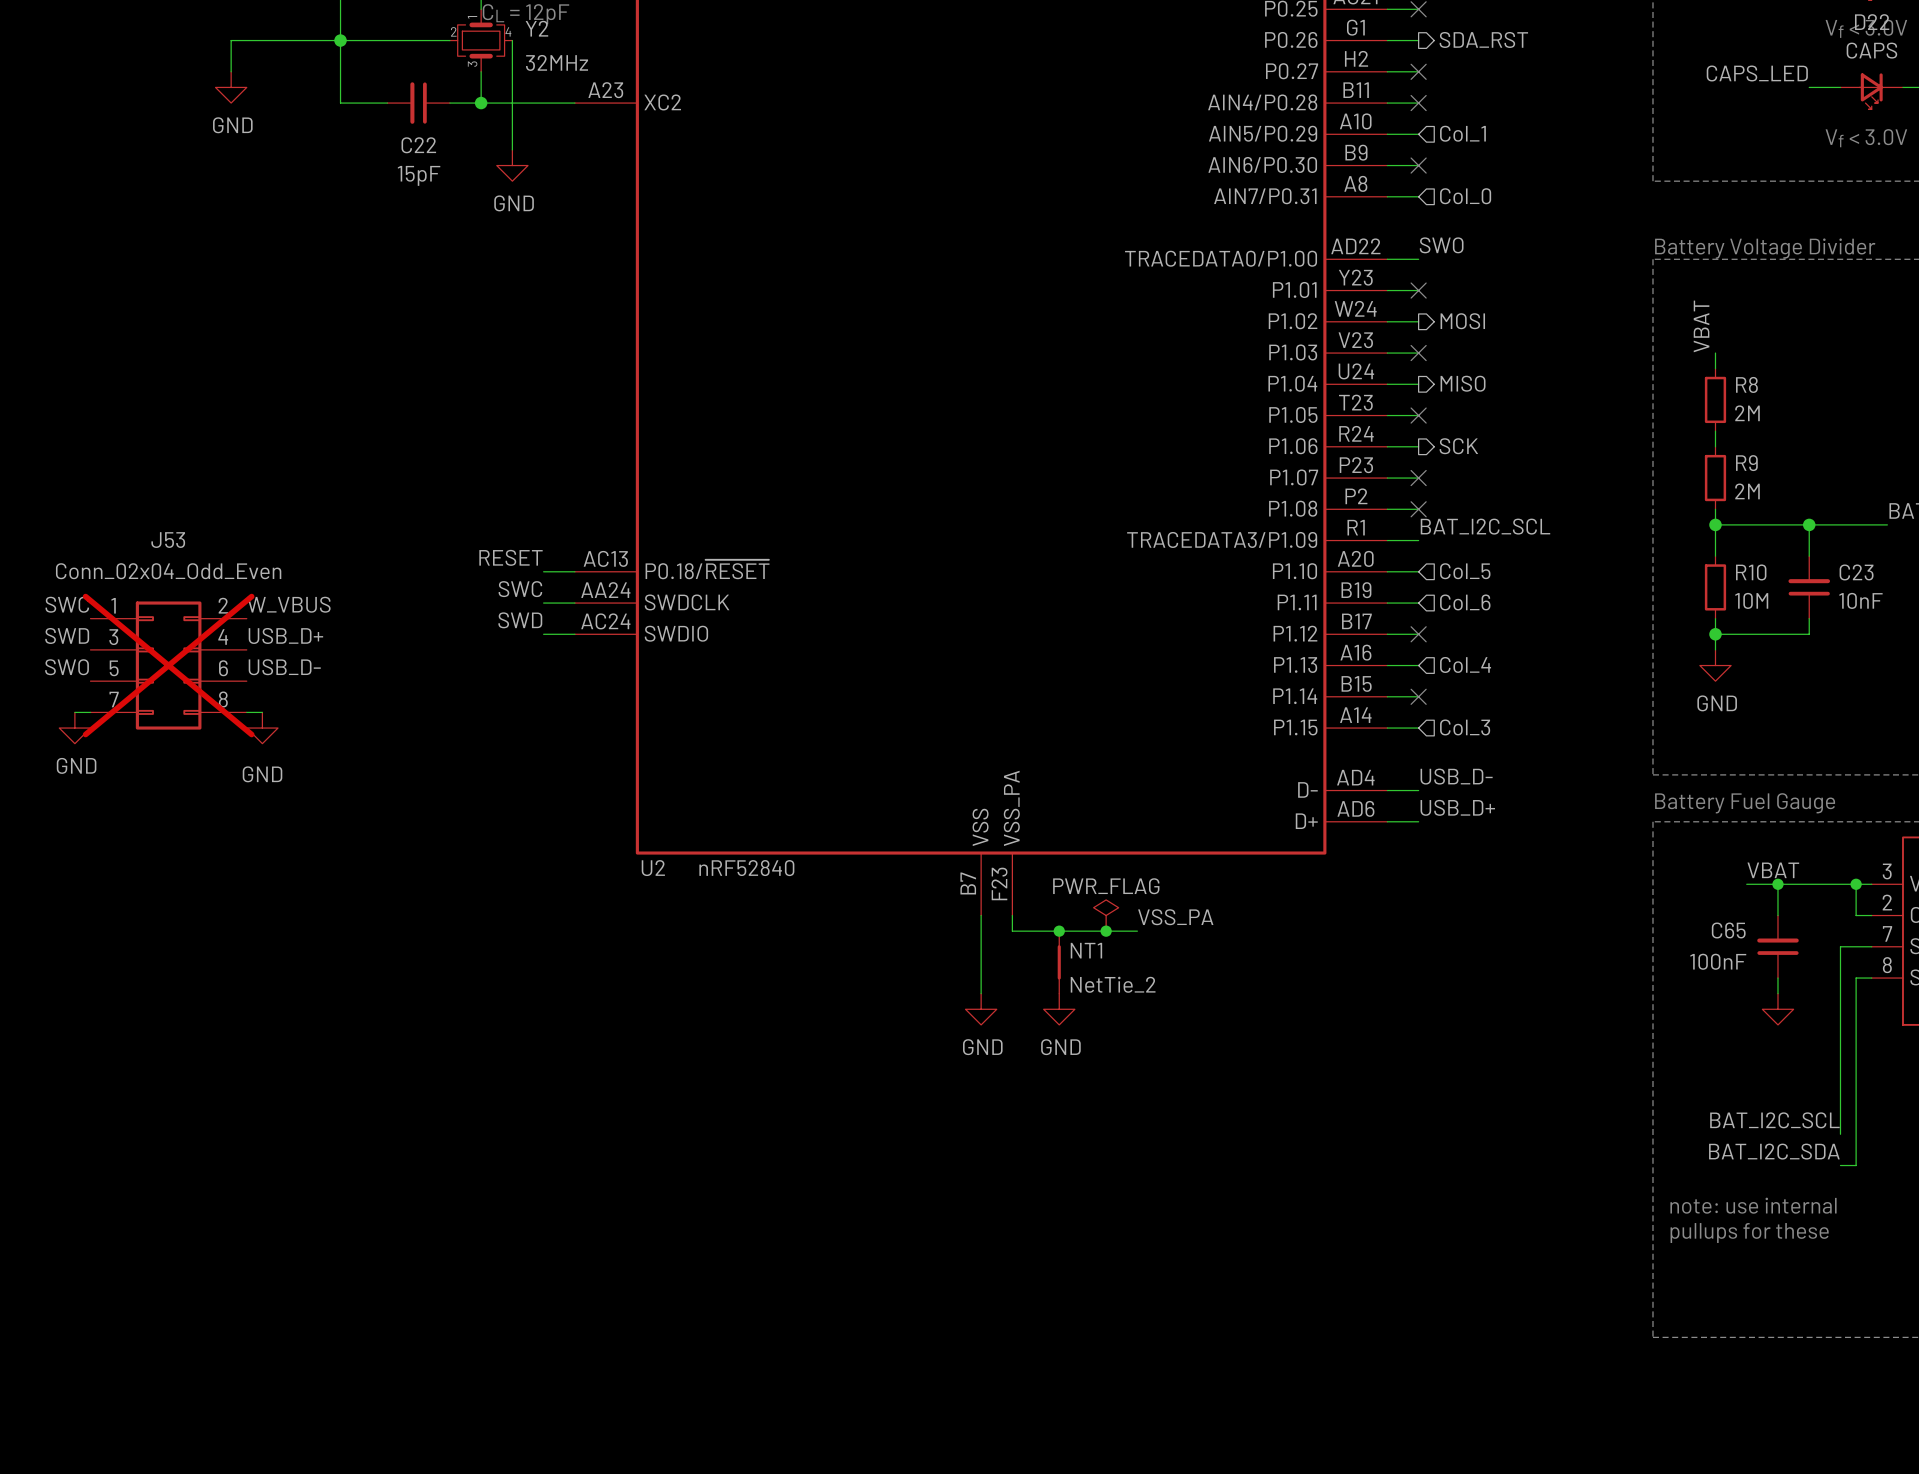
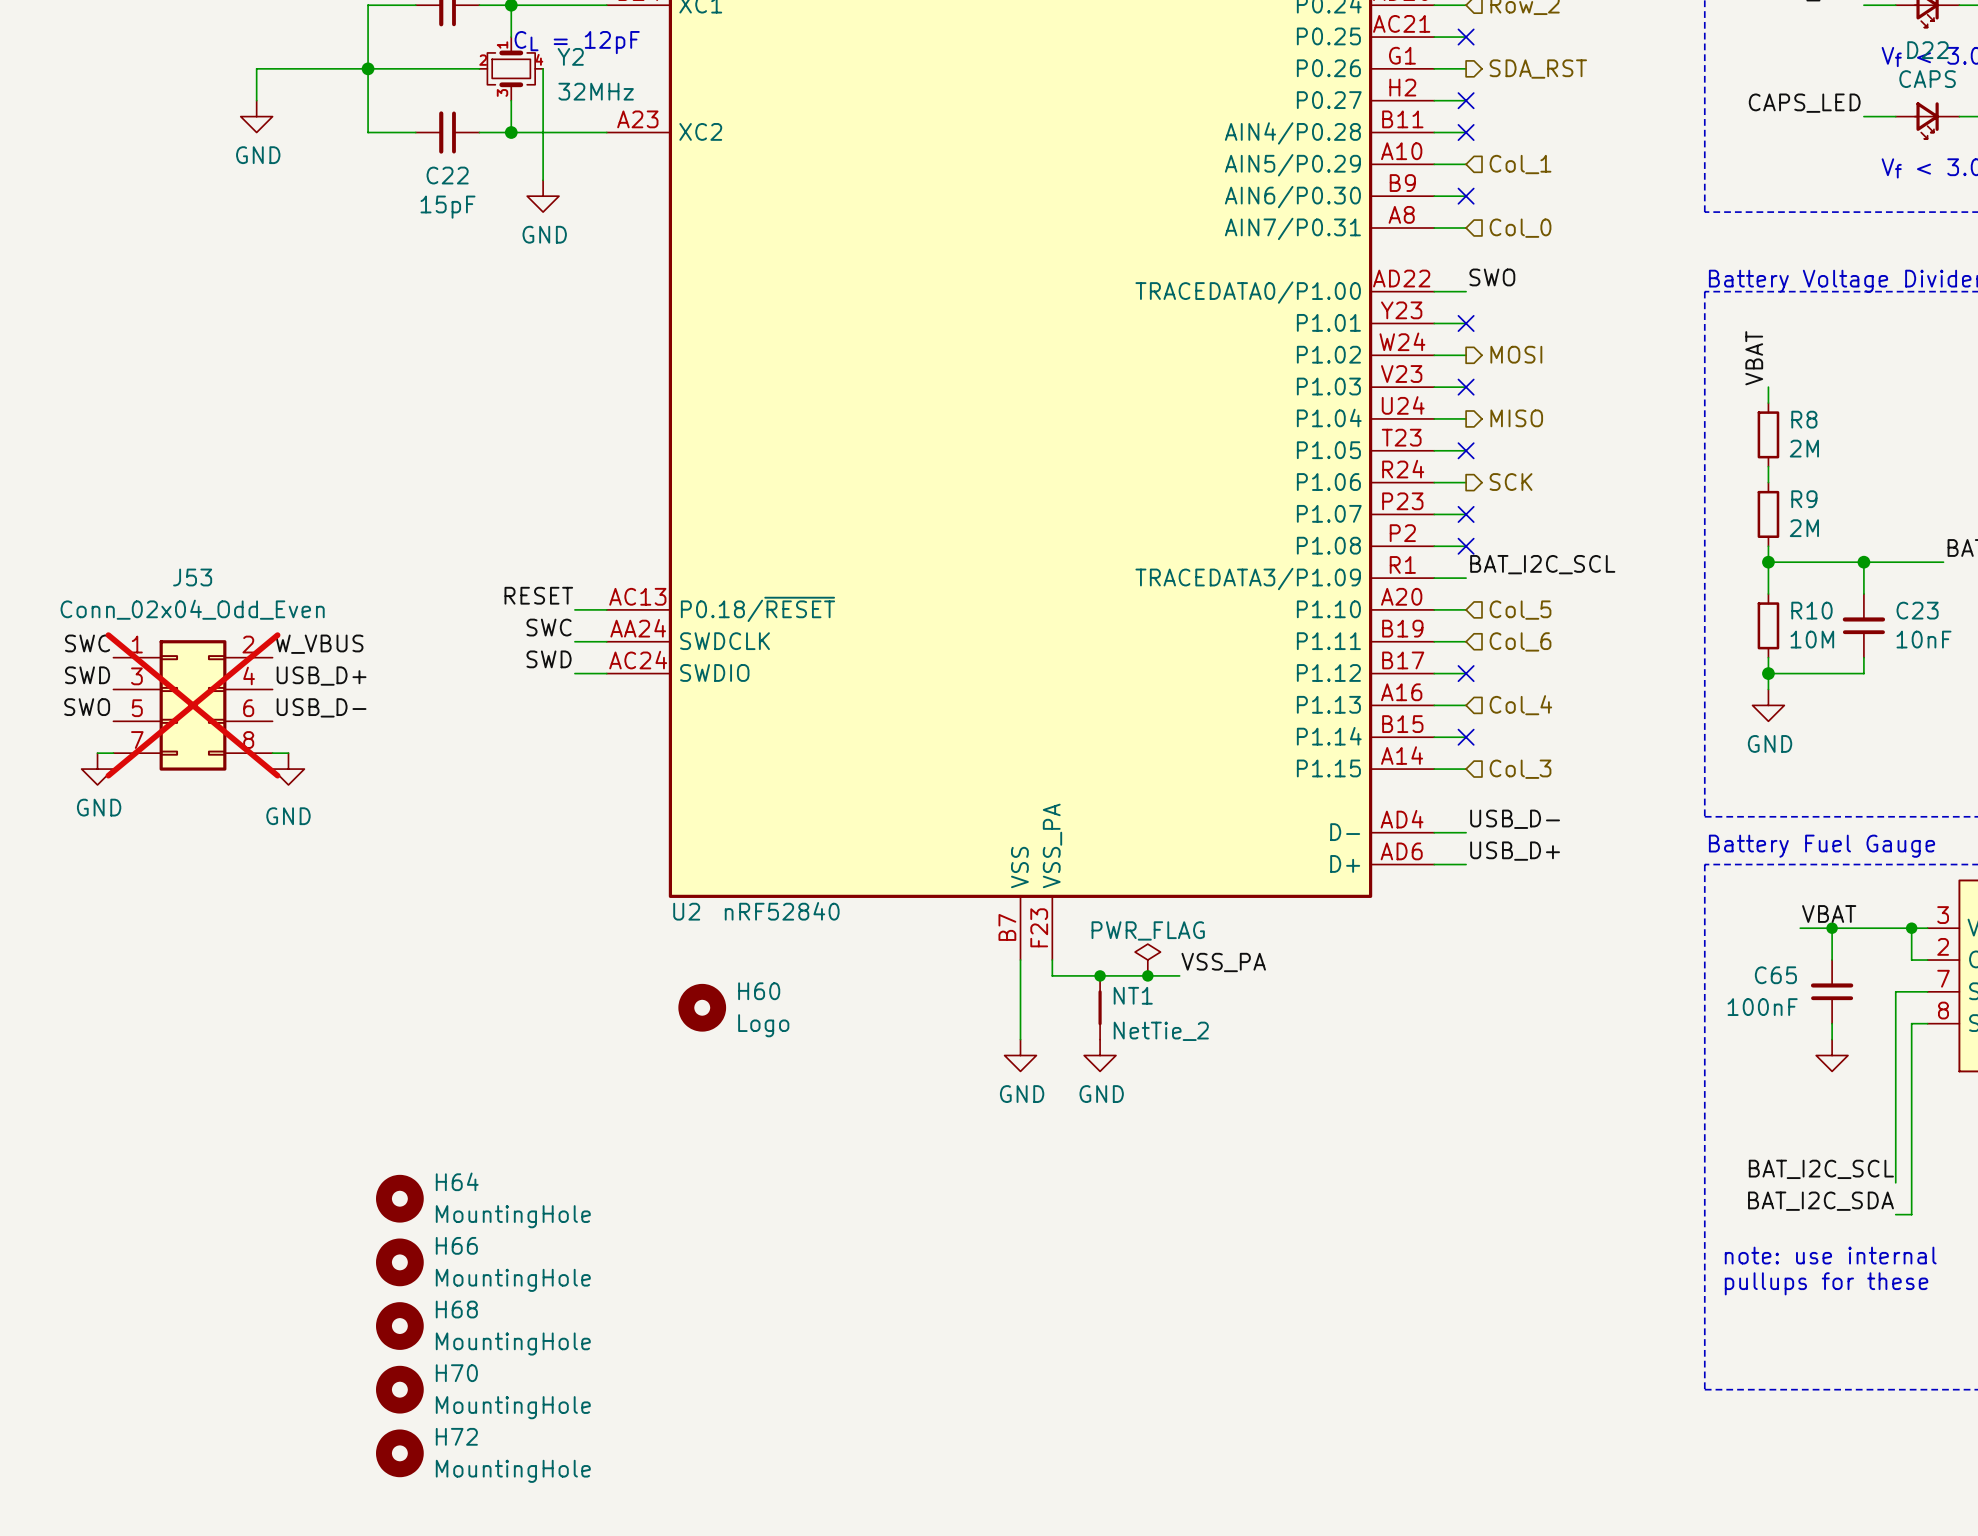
H60: none -> Logo (702, 1007)
H64: none -> MountingHole (399, 1198)
H66: none -> MountingHole (399, 1262)
H68: none -> MountingHole (399, 1326)
H70: none -> MountingHole (399, 1389)
H72: none -> MountingHole (399, 1453)

